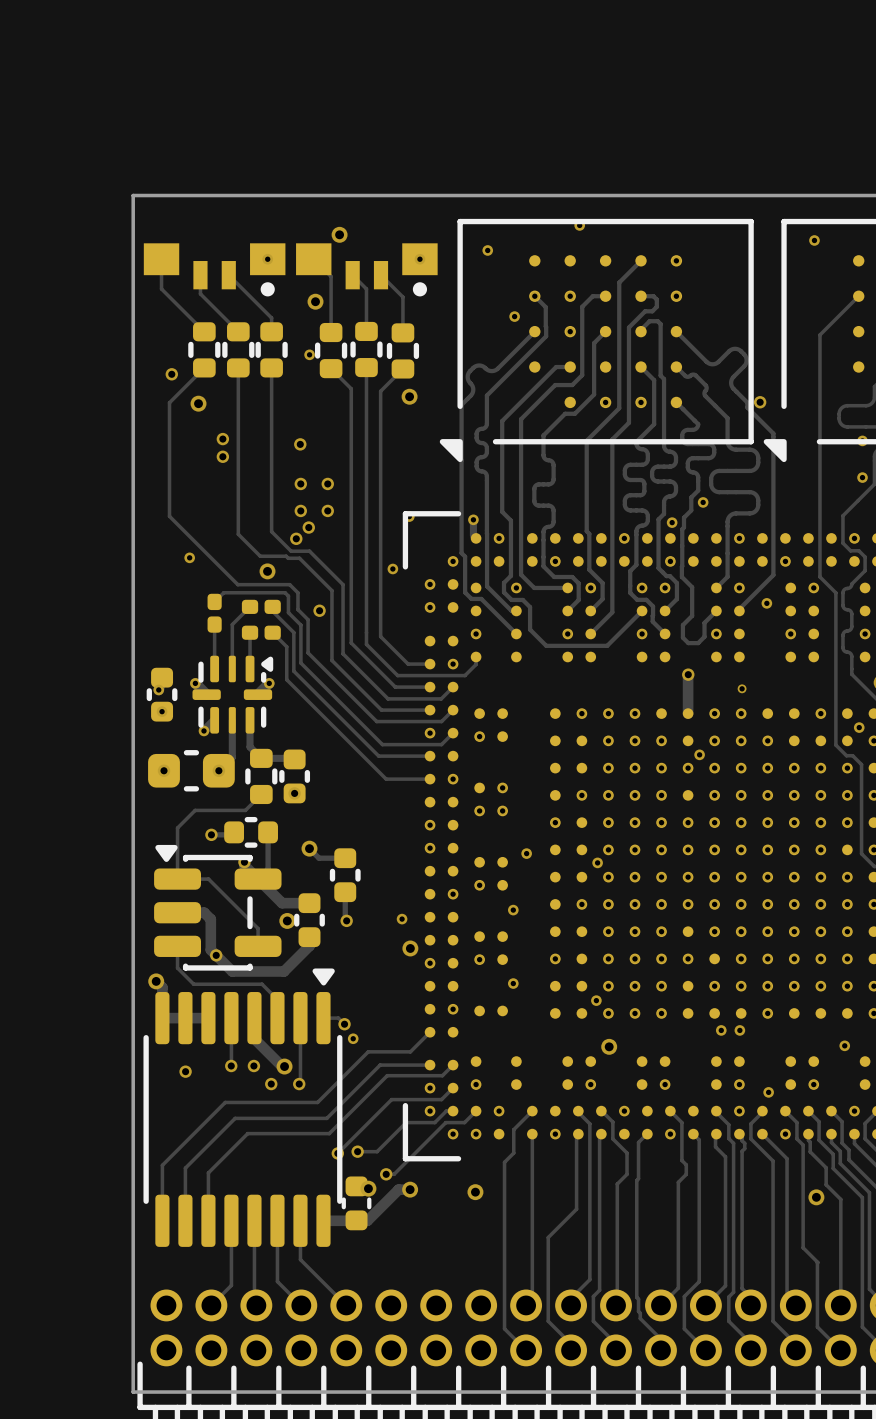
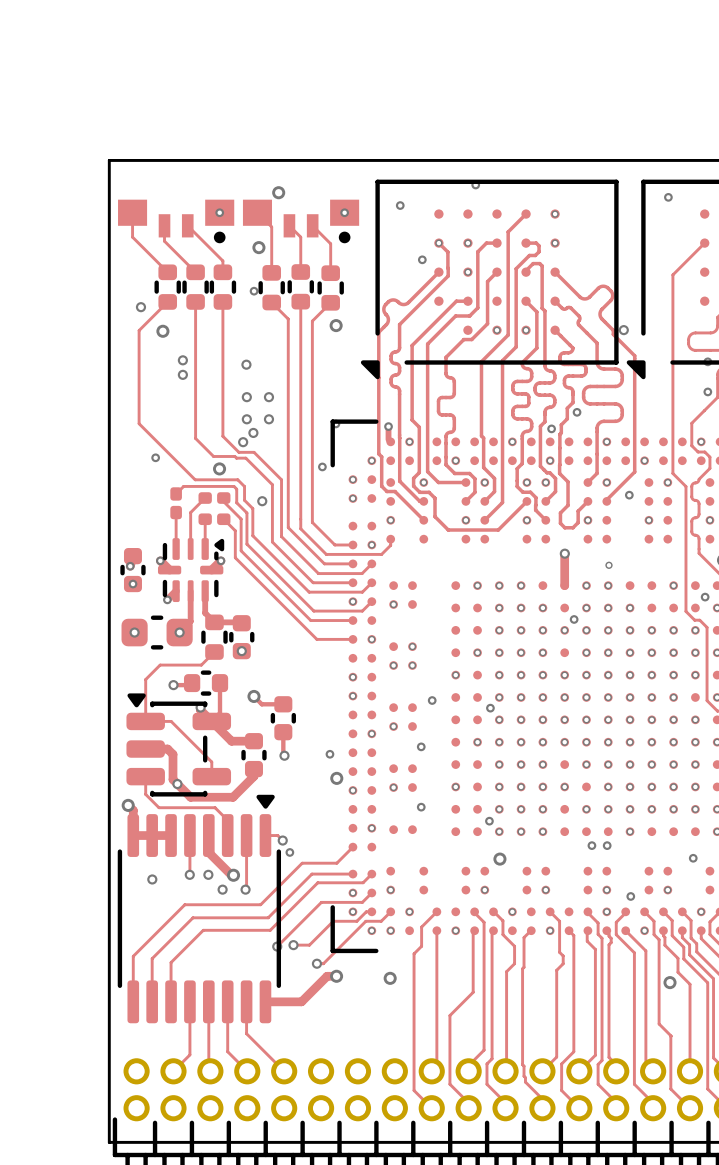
via: (287, 920) -> none
via: (368, 1188) -> none
part: (356, 1203) -> none

